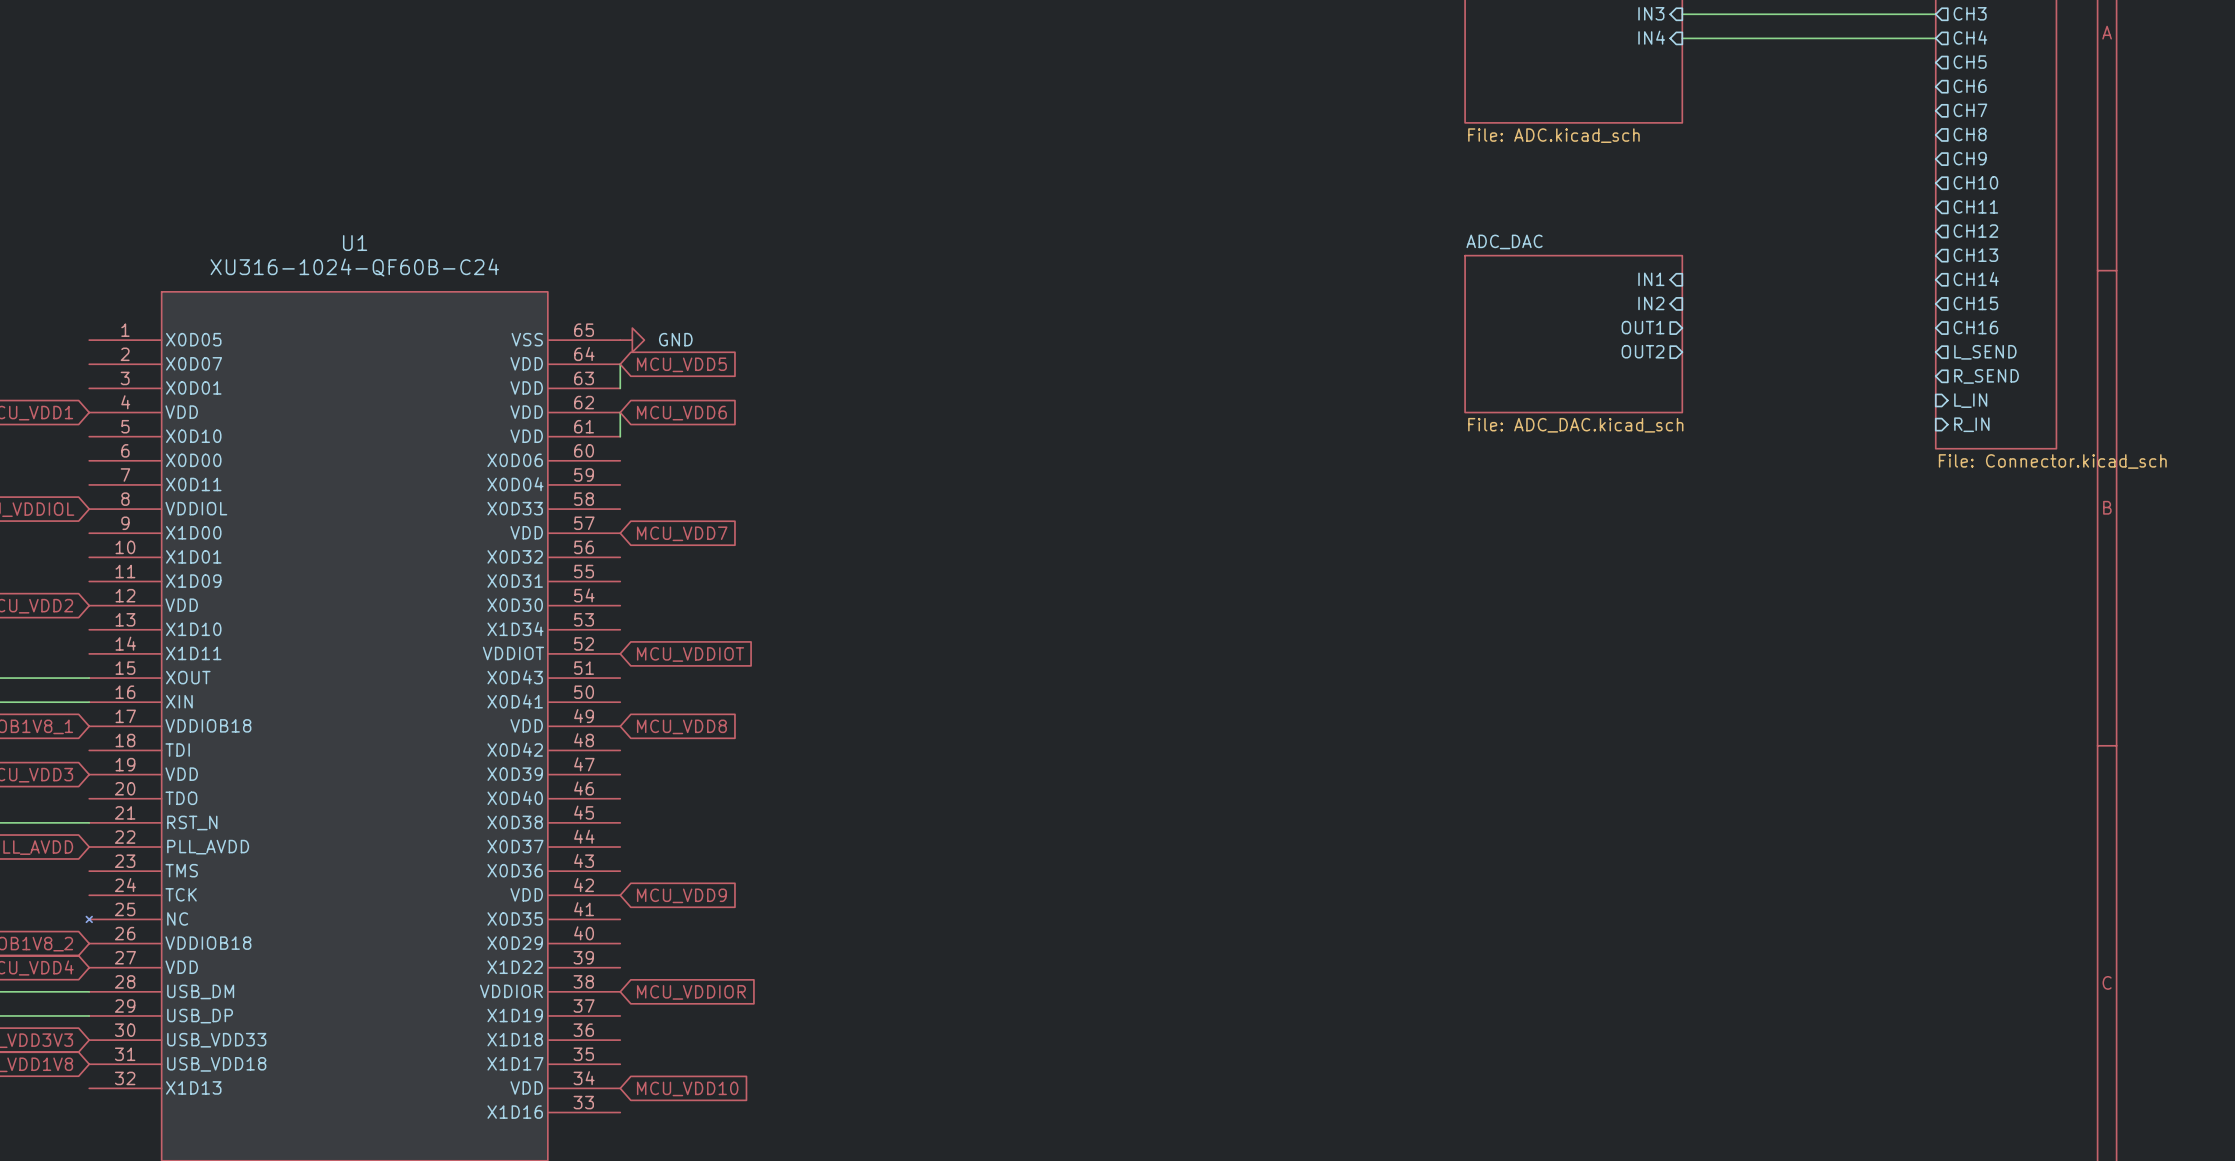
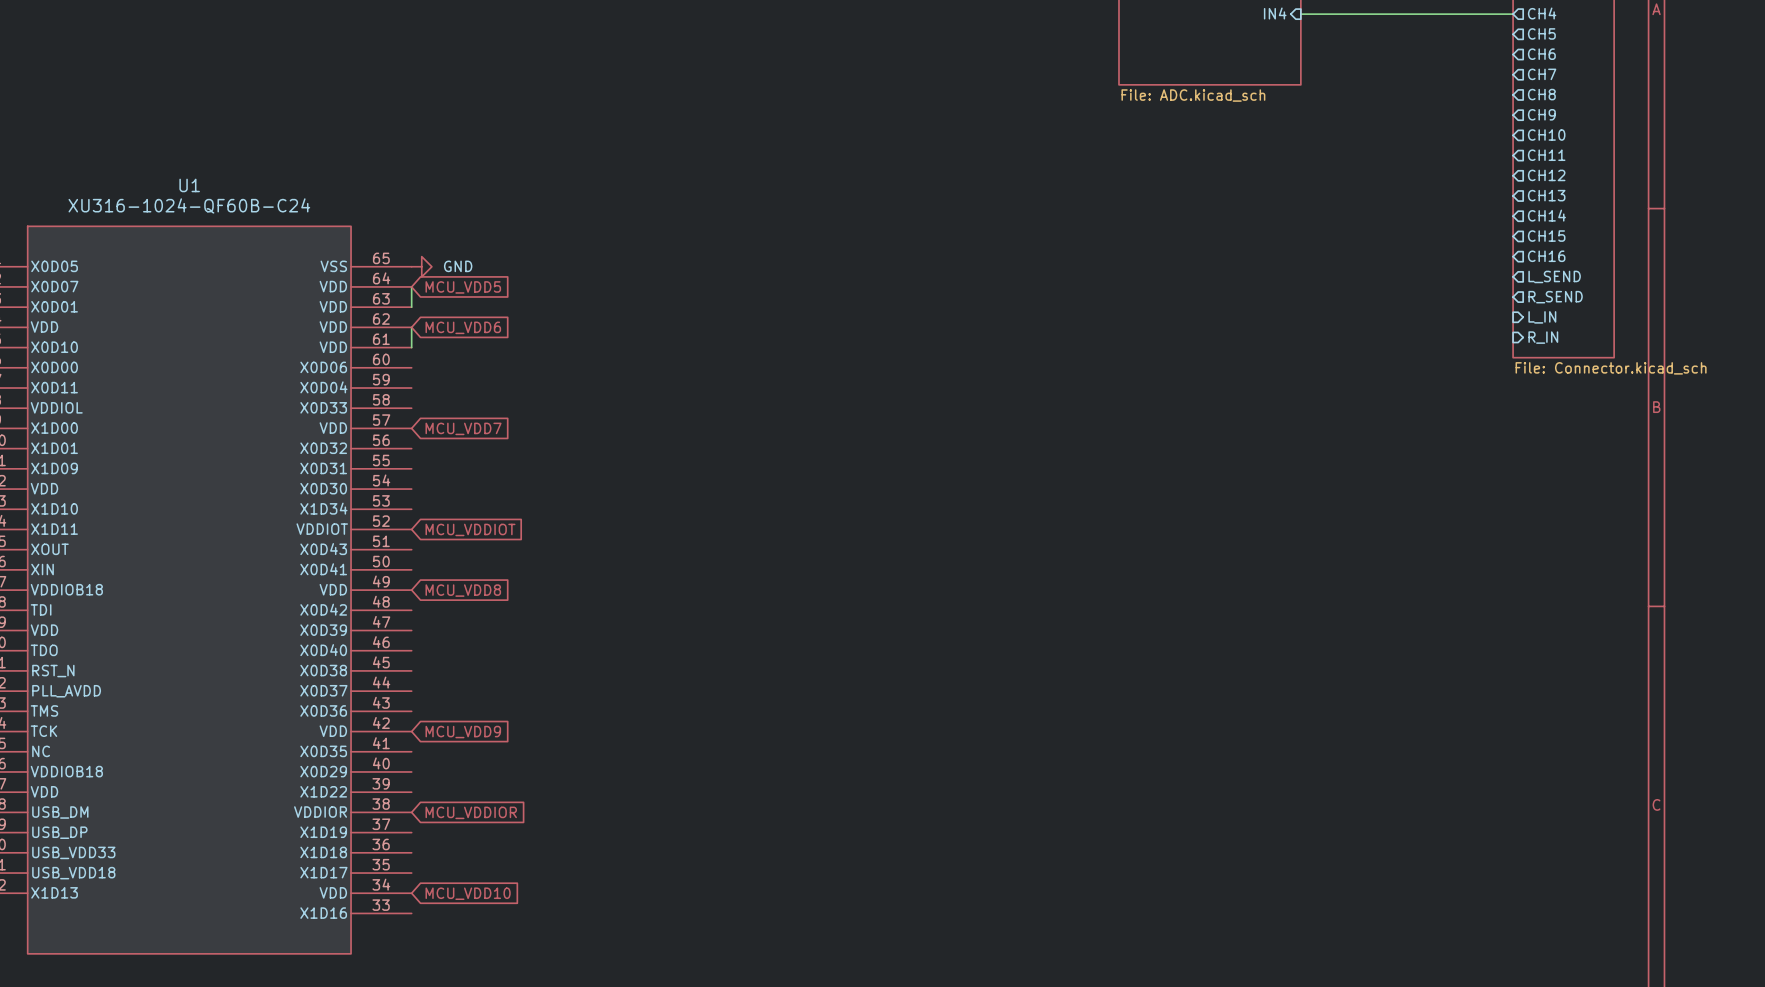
sheet pin: IN1 (1651, 279) -> none
sheet pin: IN2 (1651, 303) -> none
sheet pin: OUT1 (1643, 327) -> none
sheet ADC_DAC: File: ADC_DAC.kicad_sch (1573, 334) -> none
sheet pin: OUT2 (1643, 351) -> none

